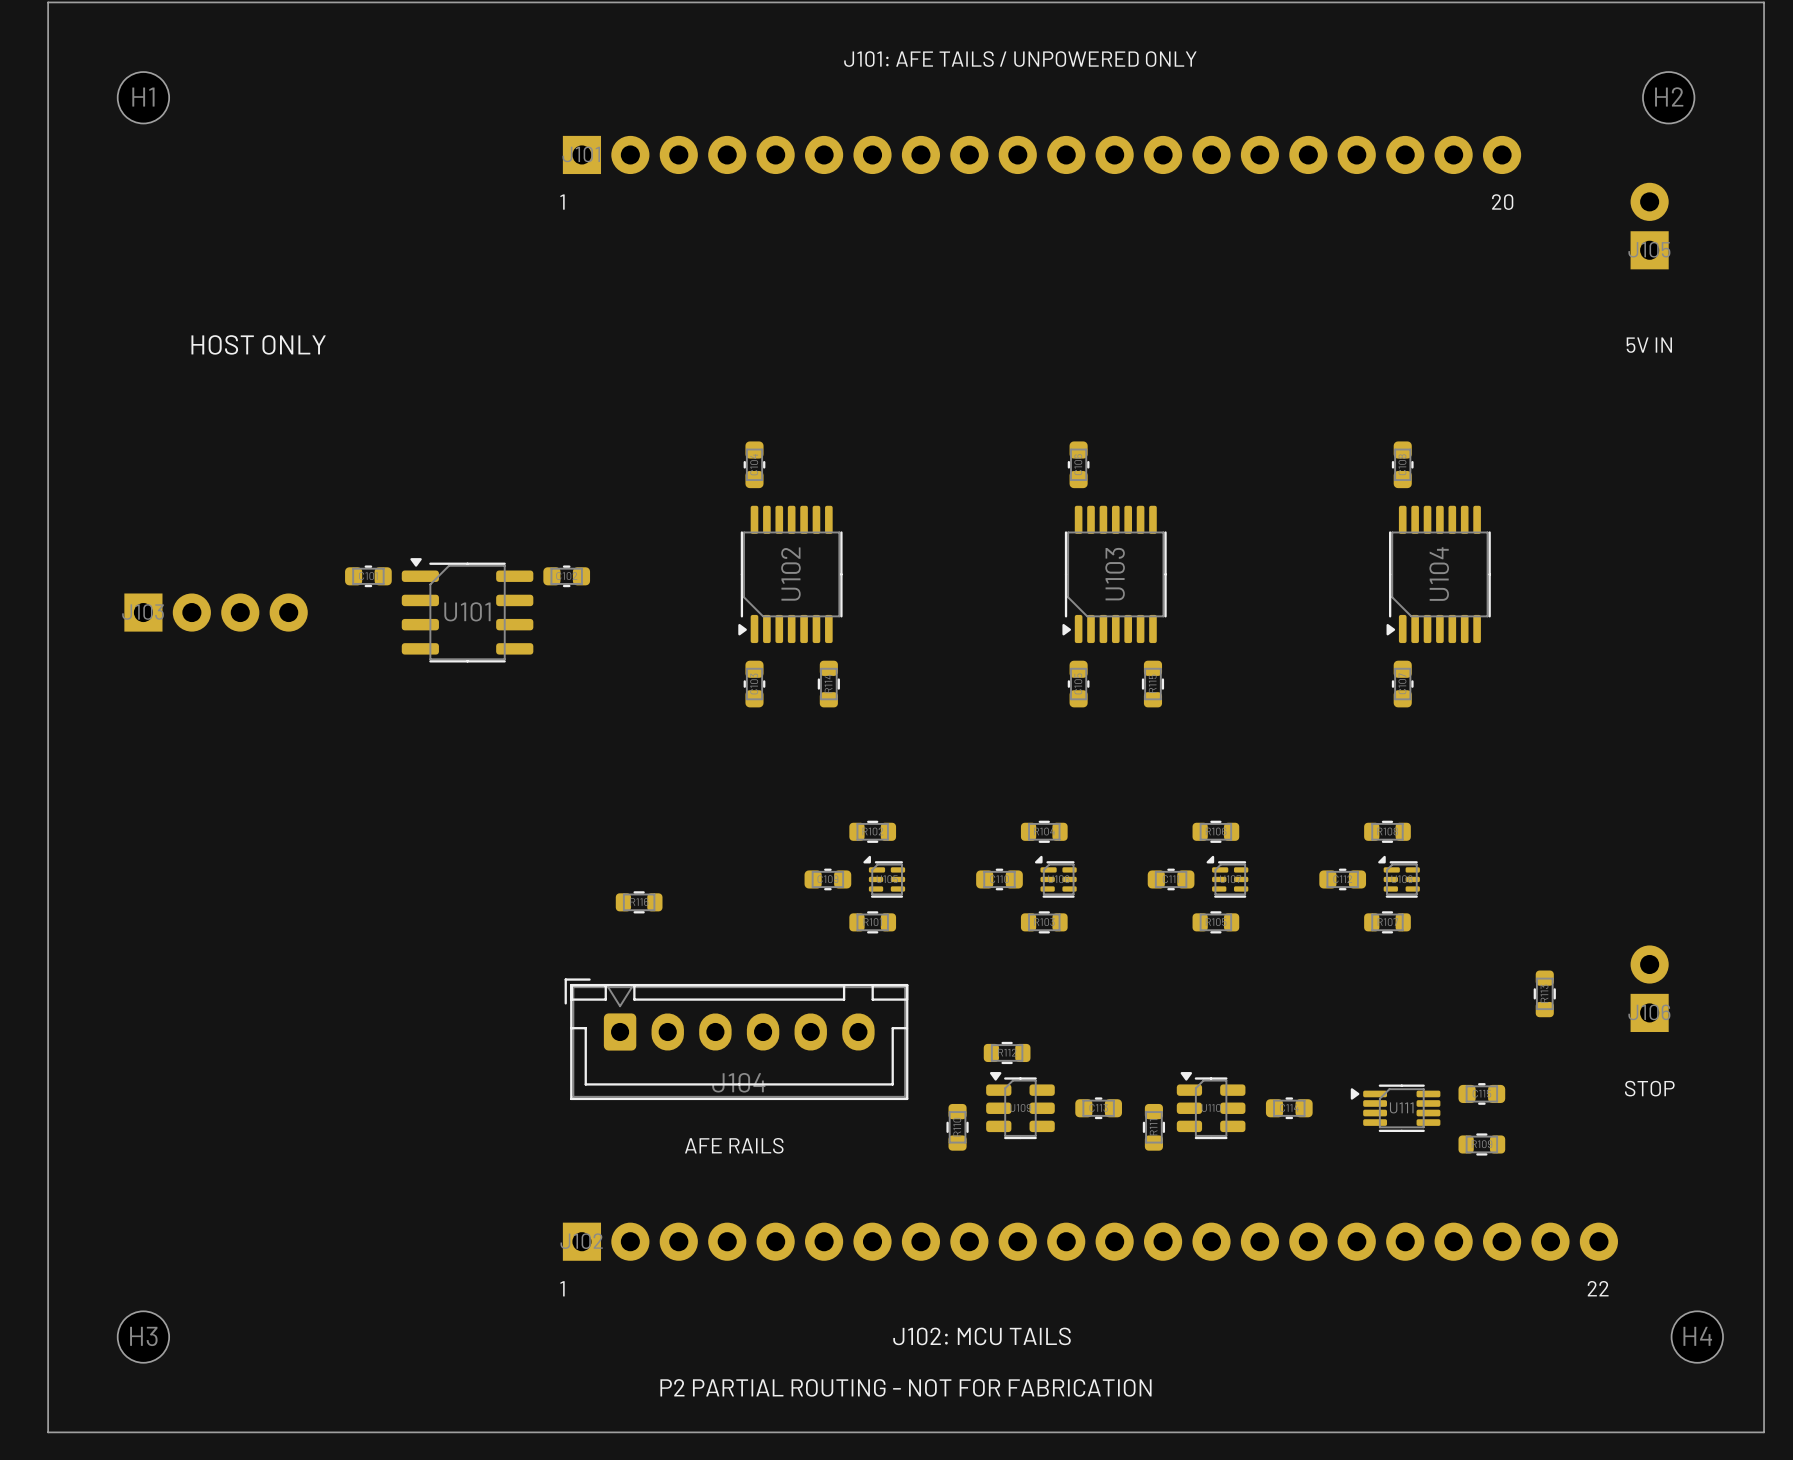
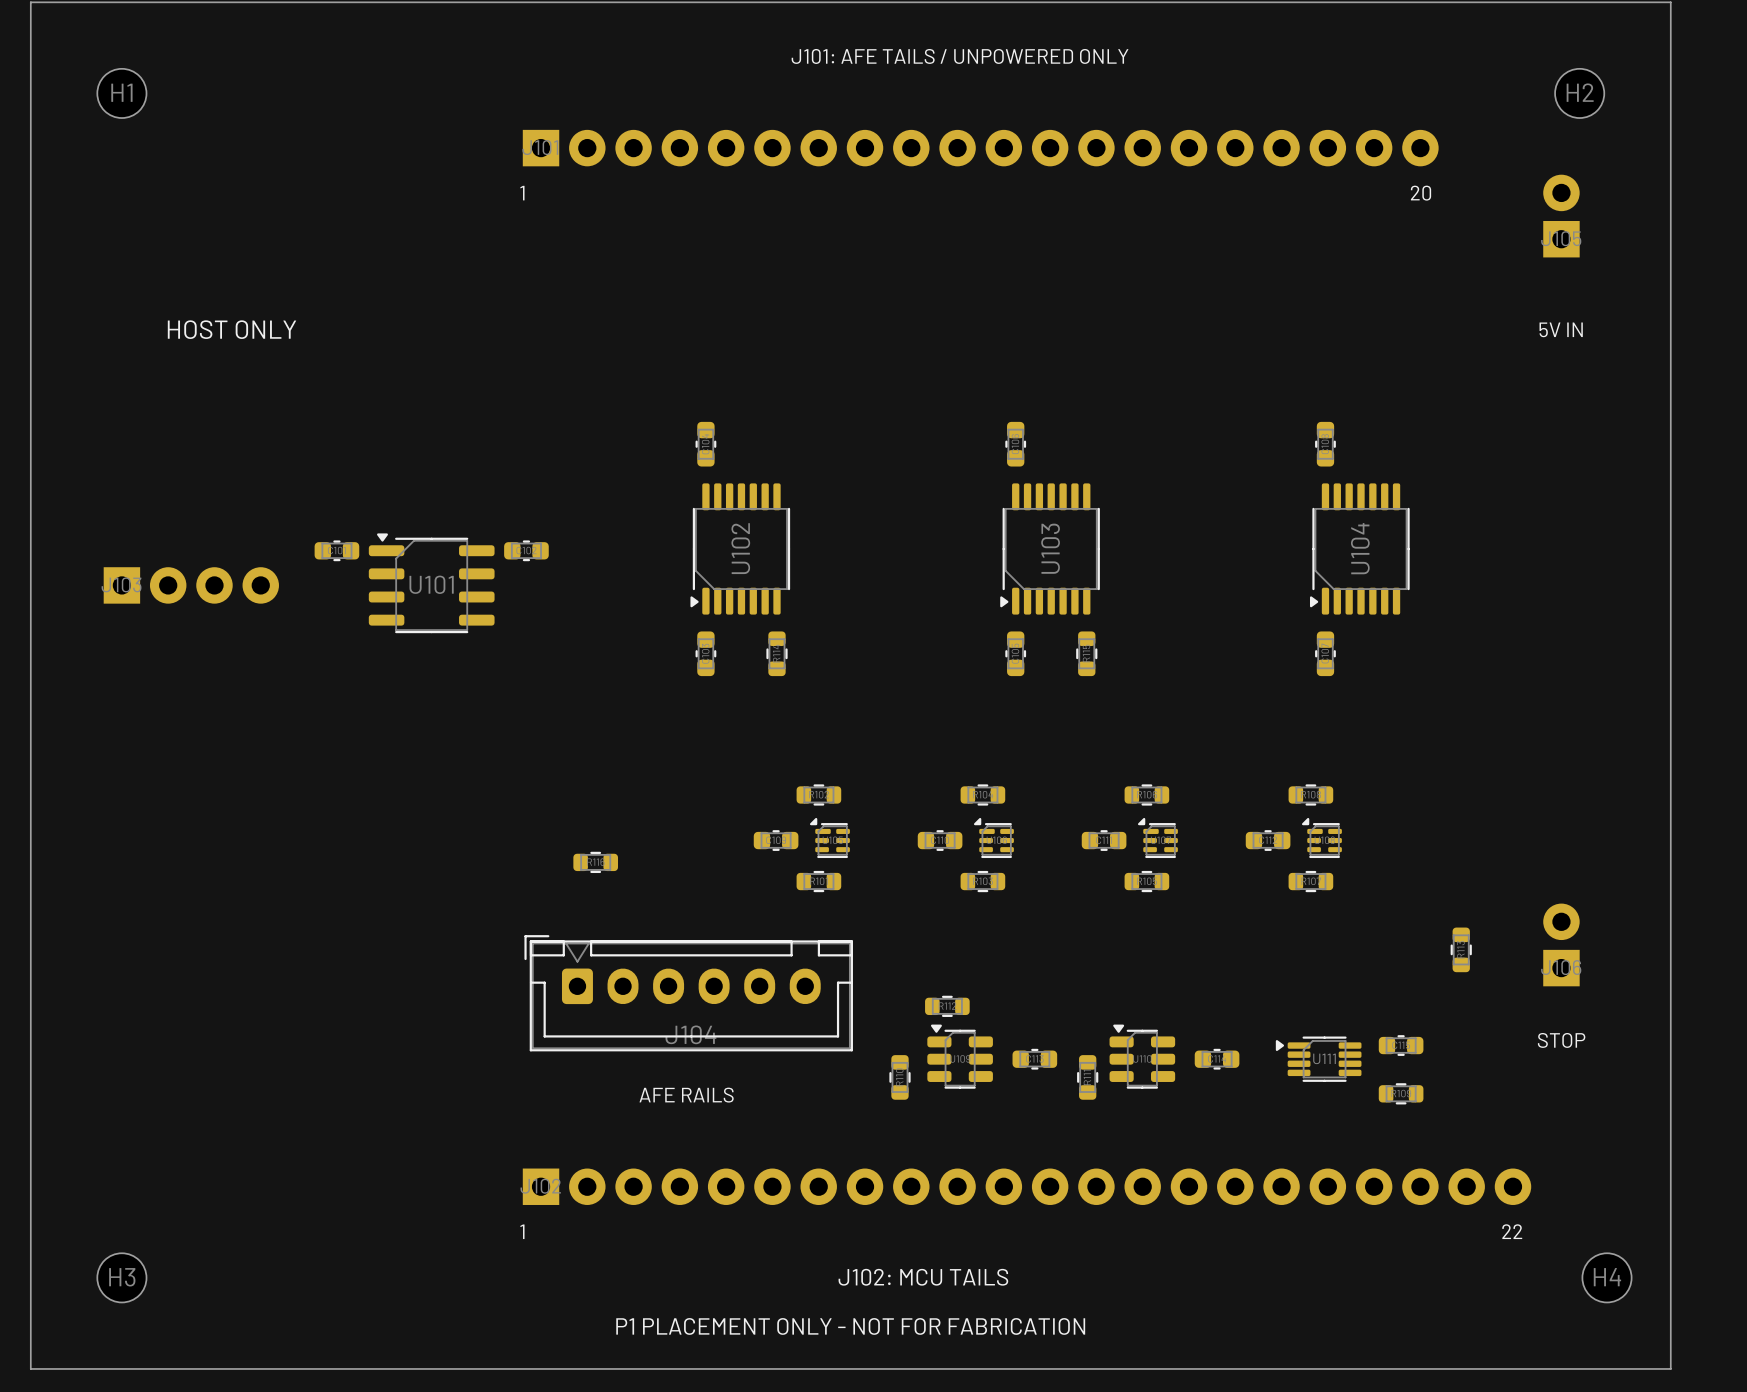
text: P2 PARTIAL ROUTING - NOT FOR FABRICATION (905, 1387) -> P1 PLACEMENT ONLY - NOT FOR FABRICATION (850, 1326)

